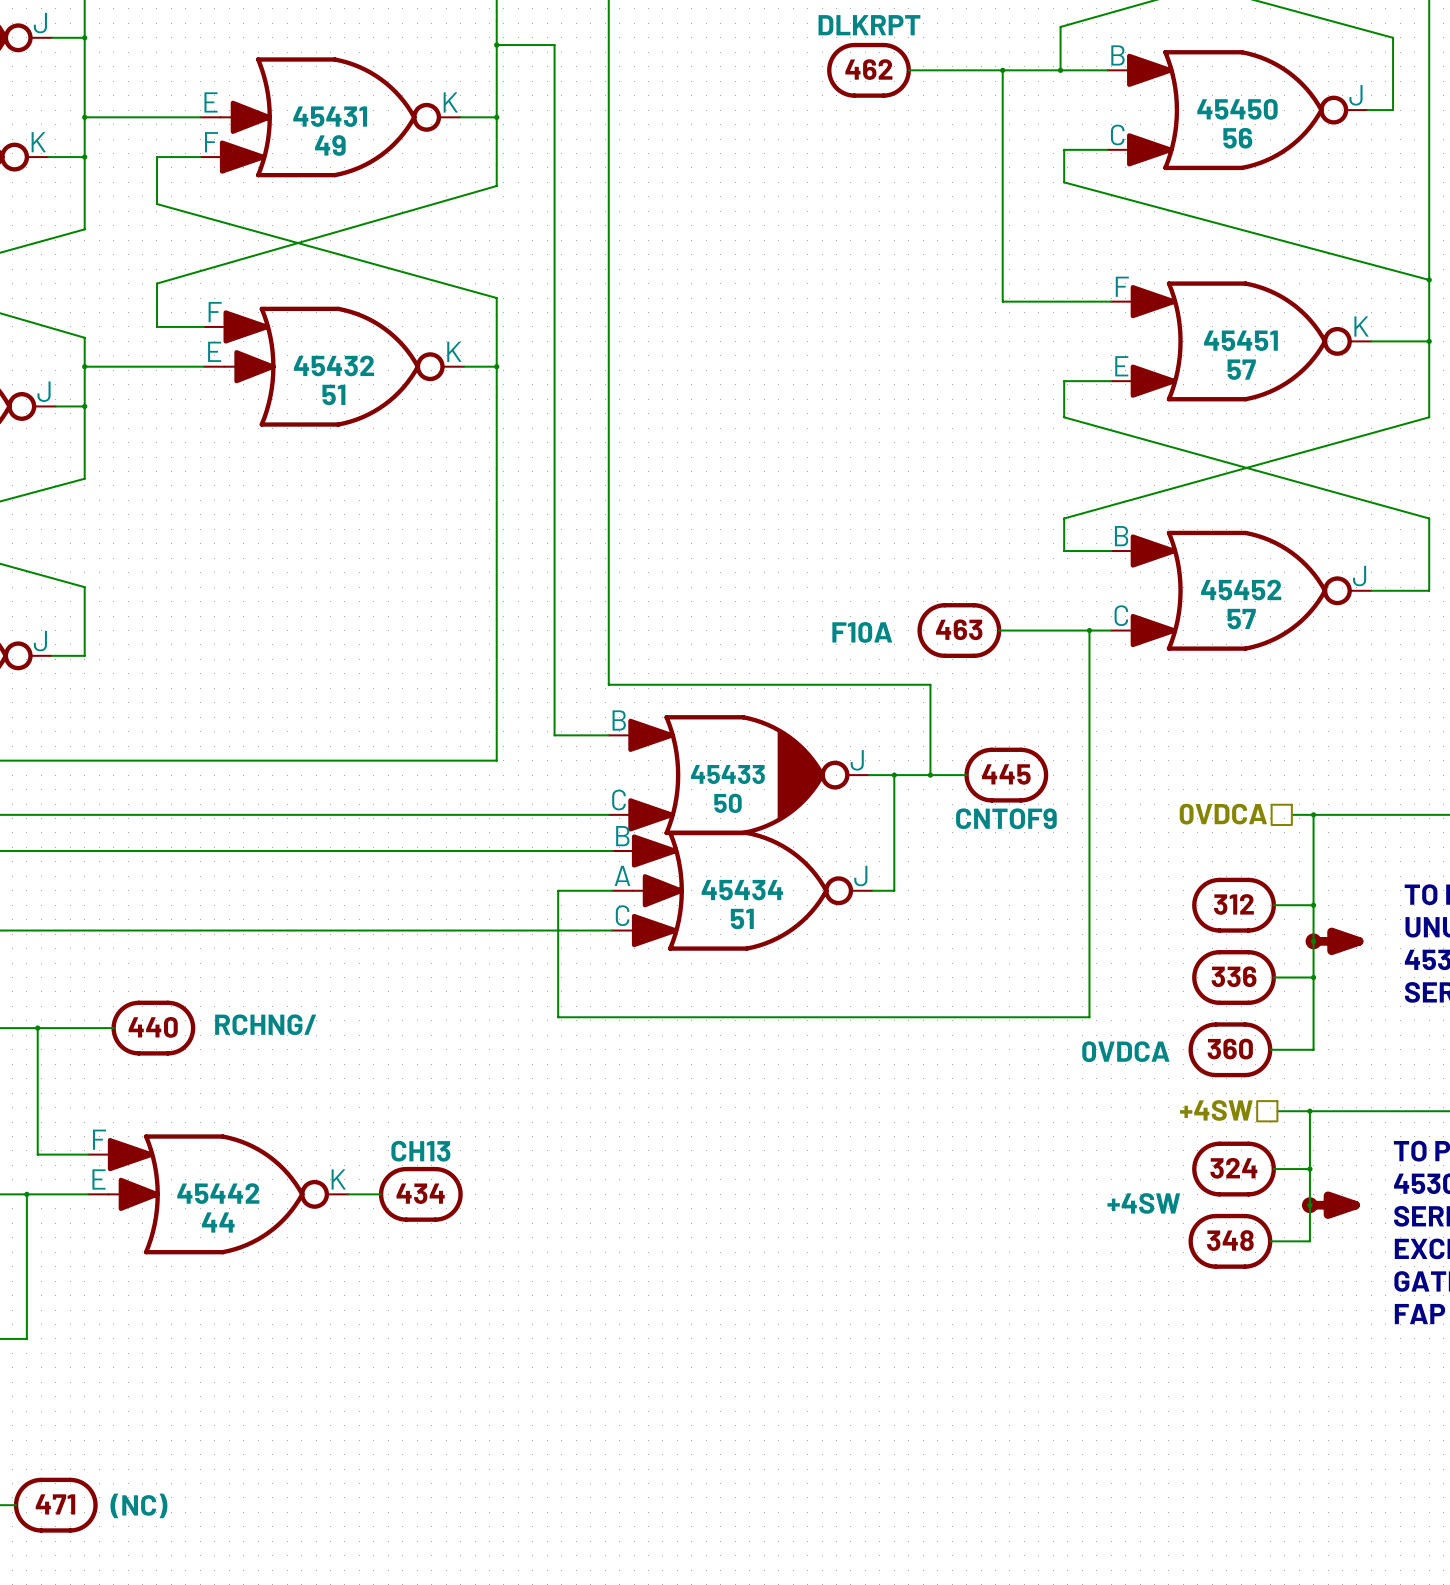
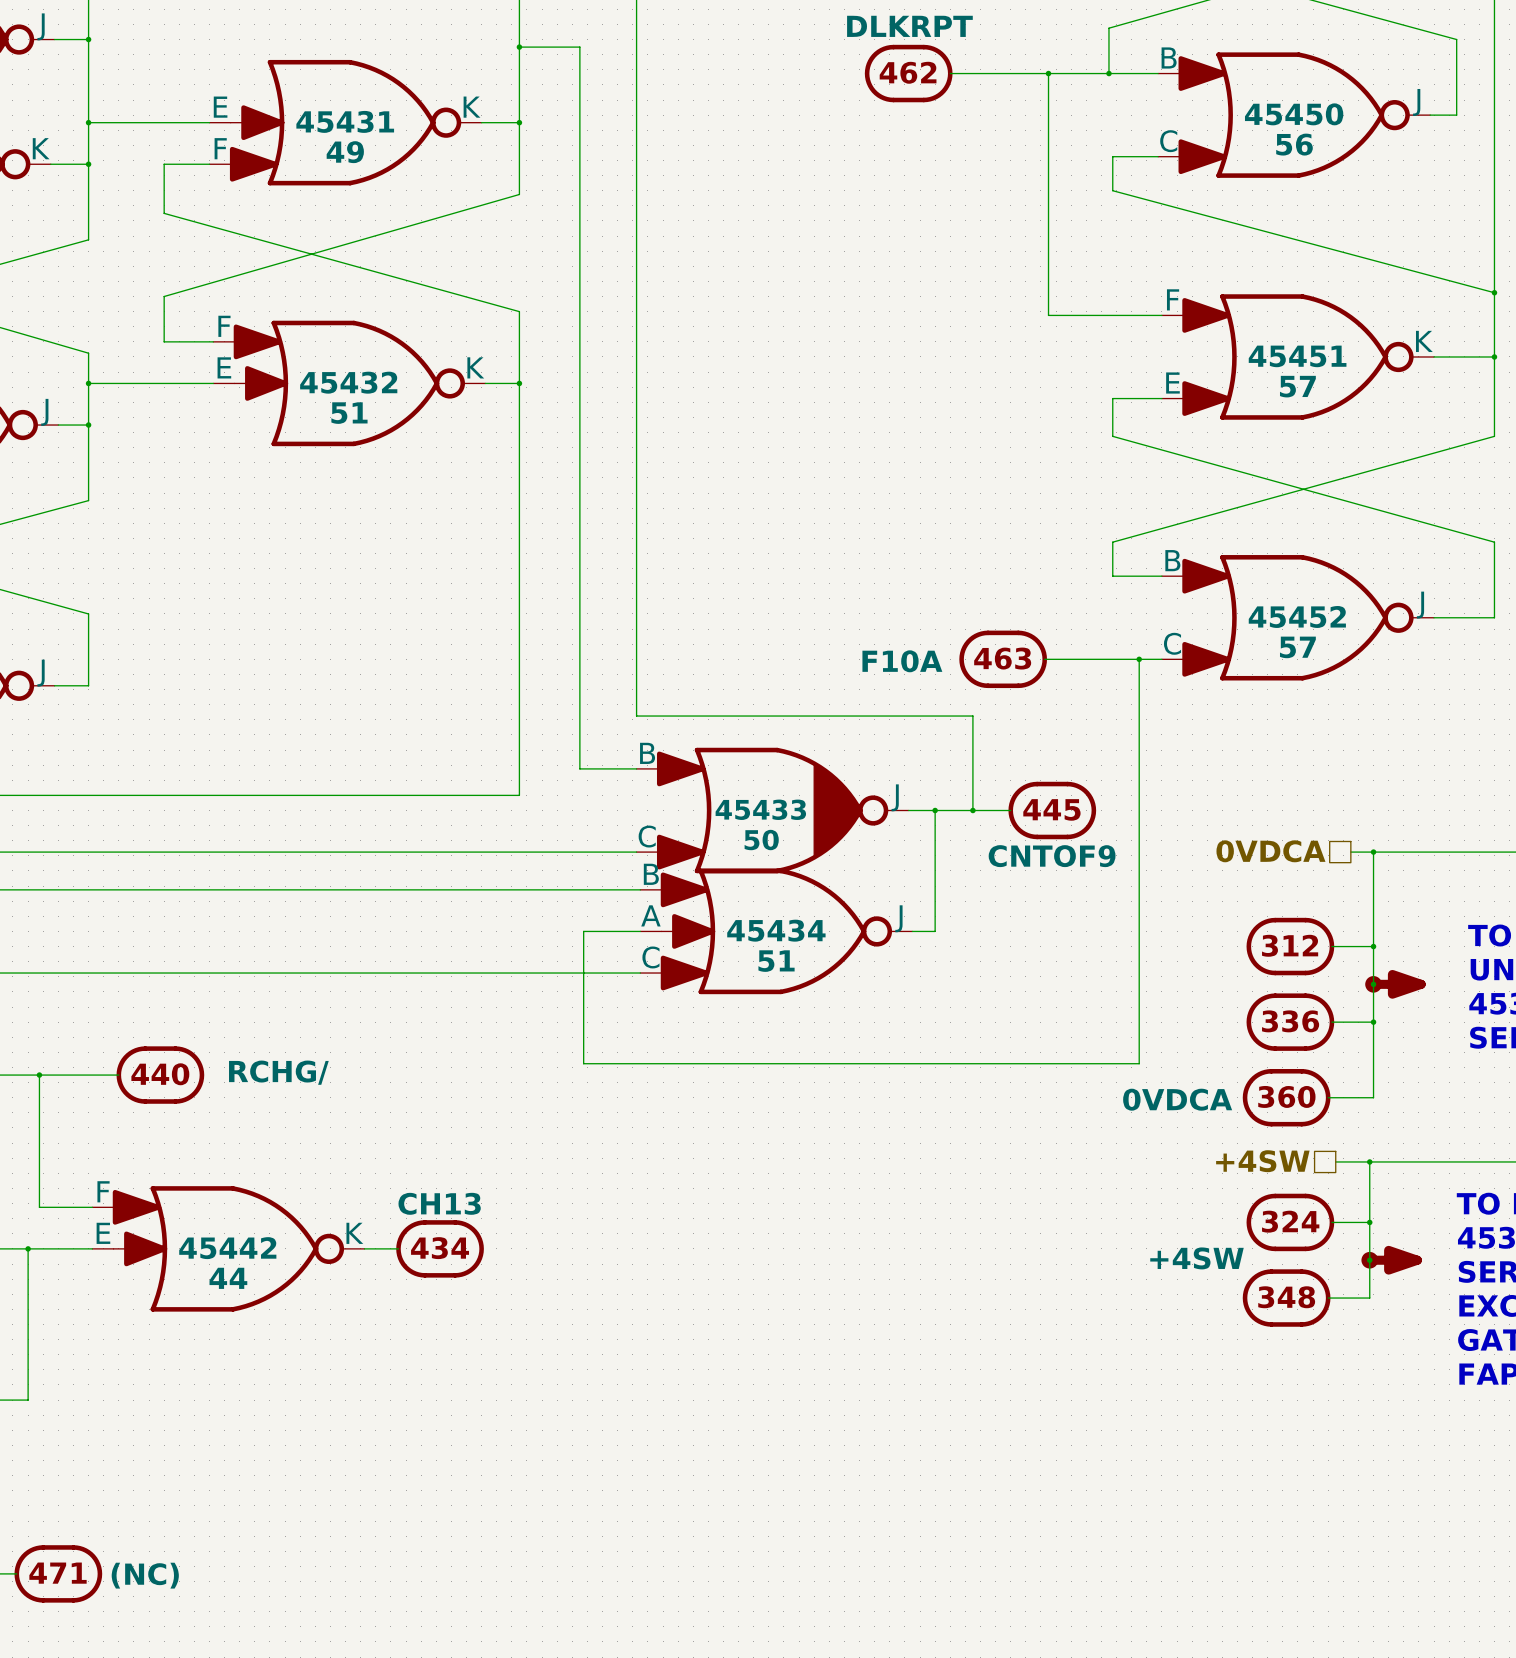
part text: RCHNG/ (265, 1024) -> RCHG/ (278, 1072)

